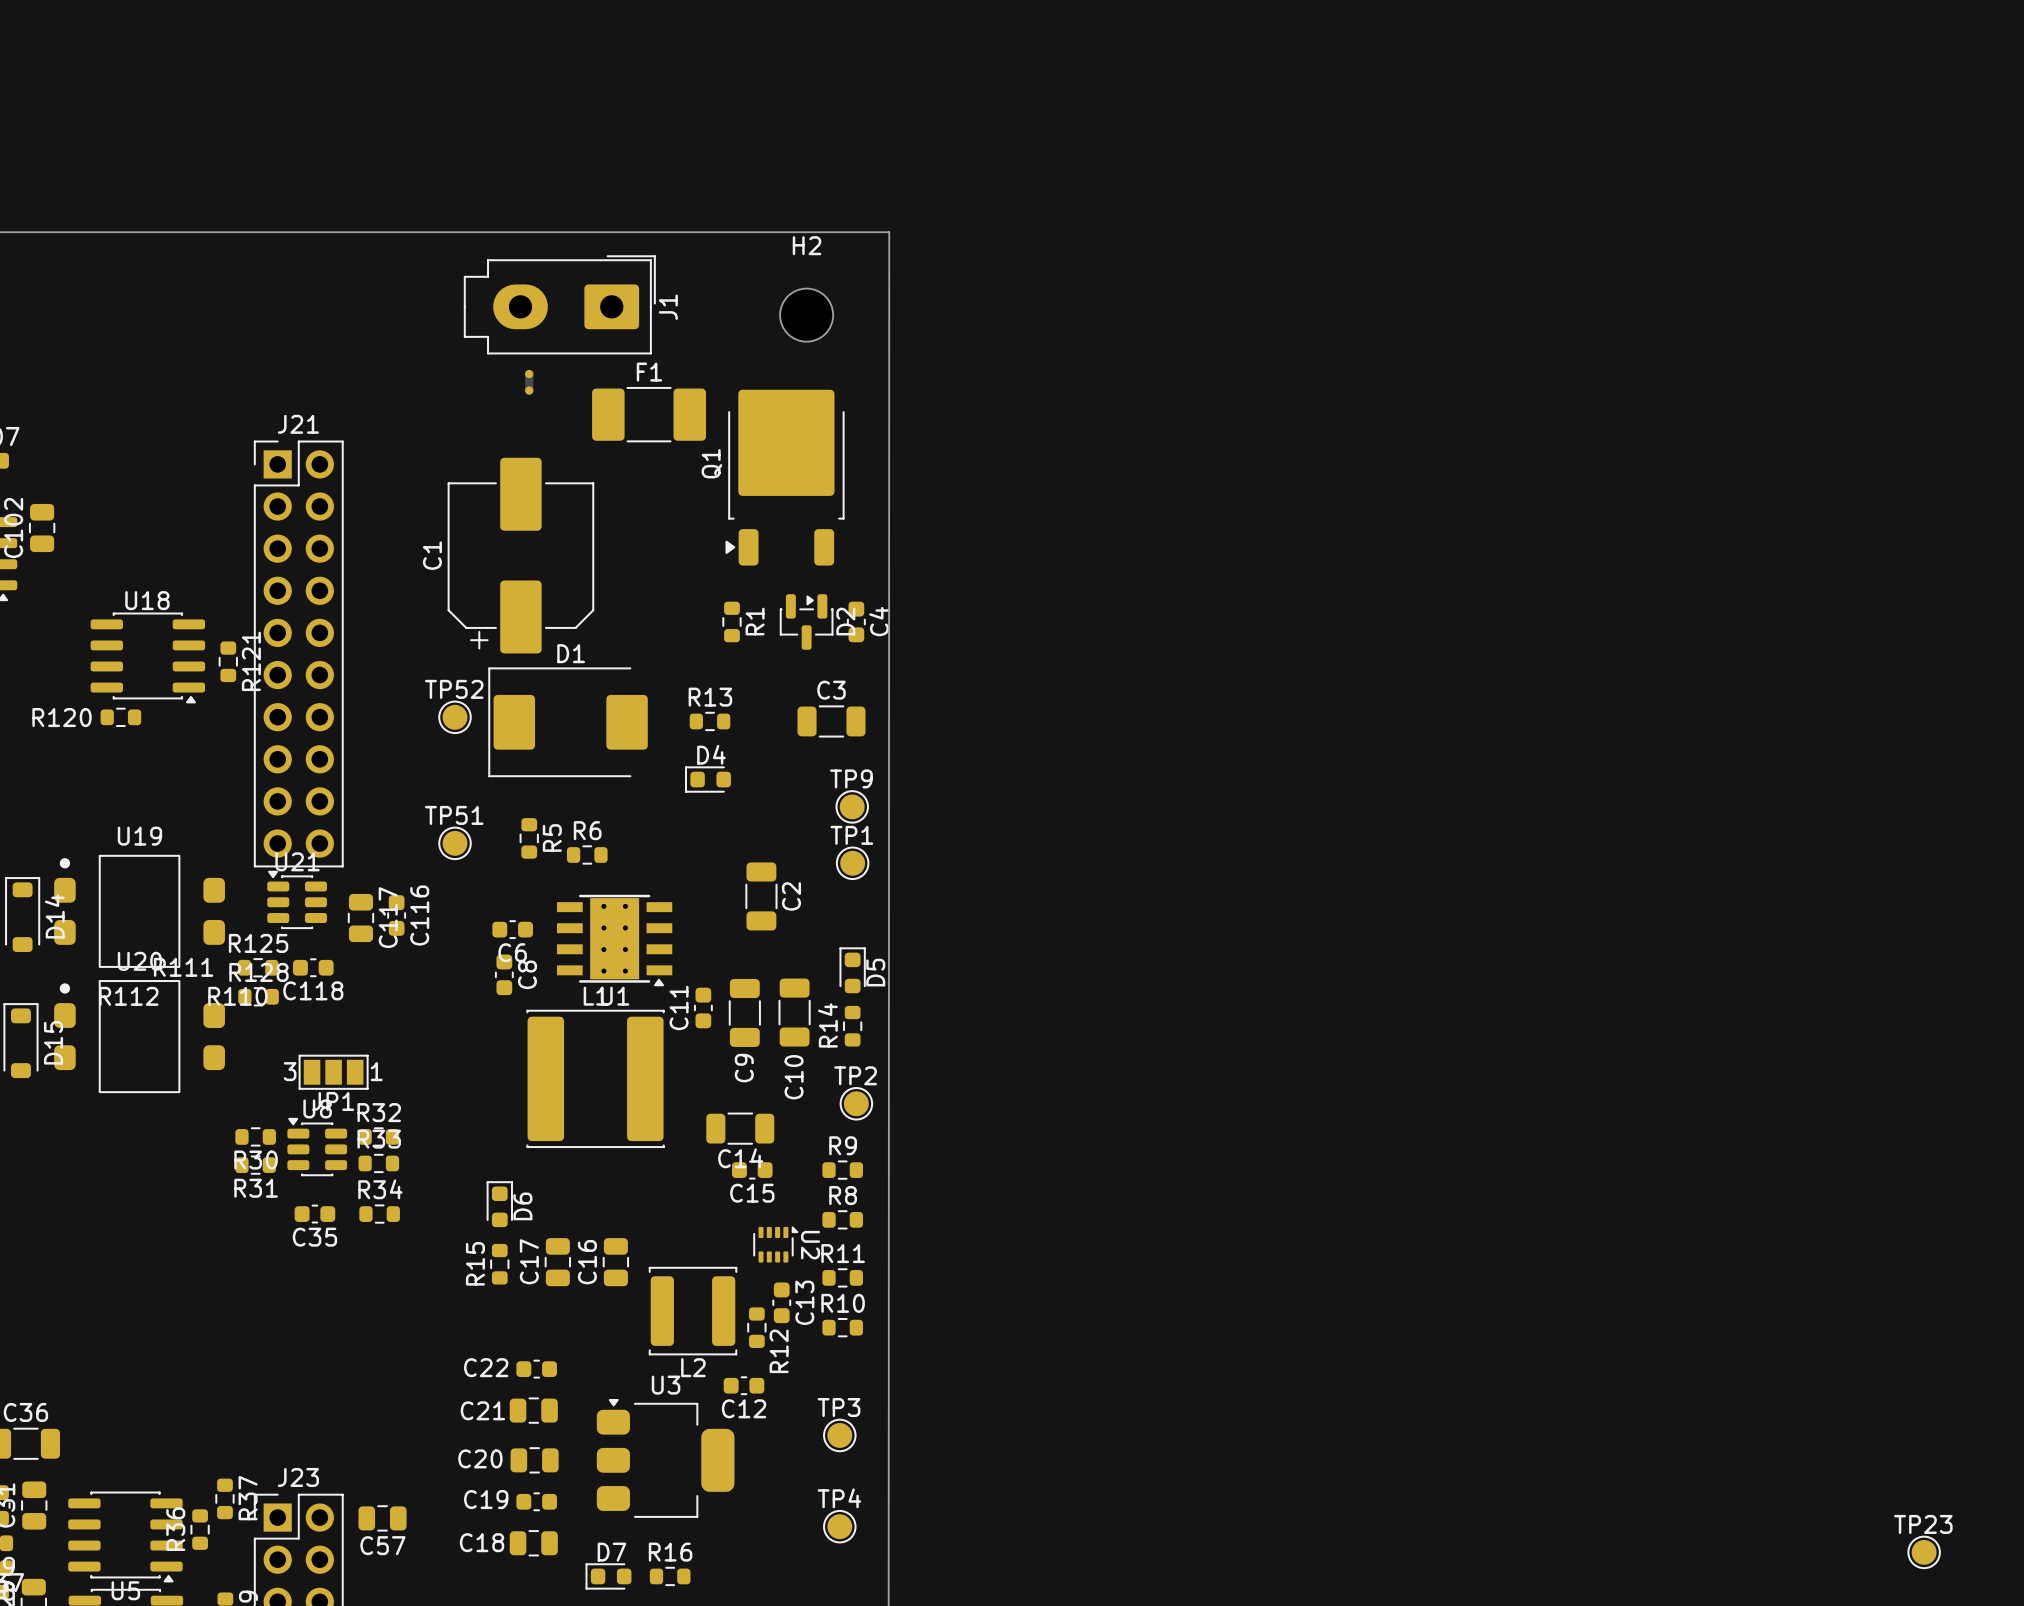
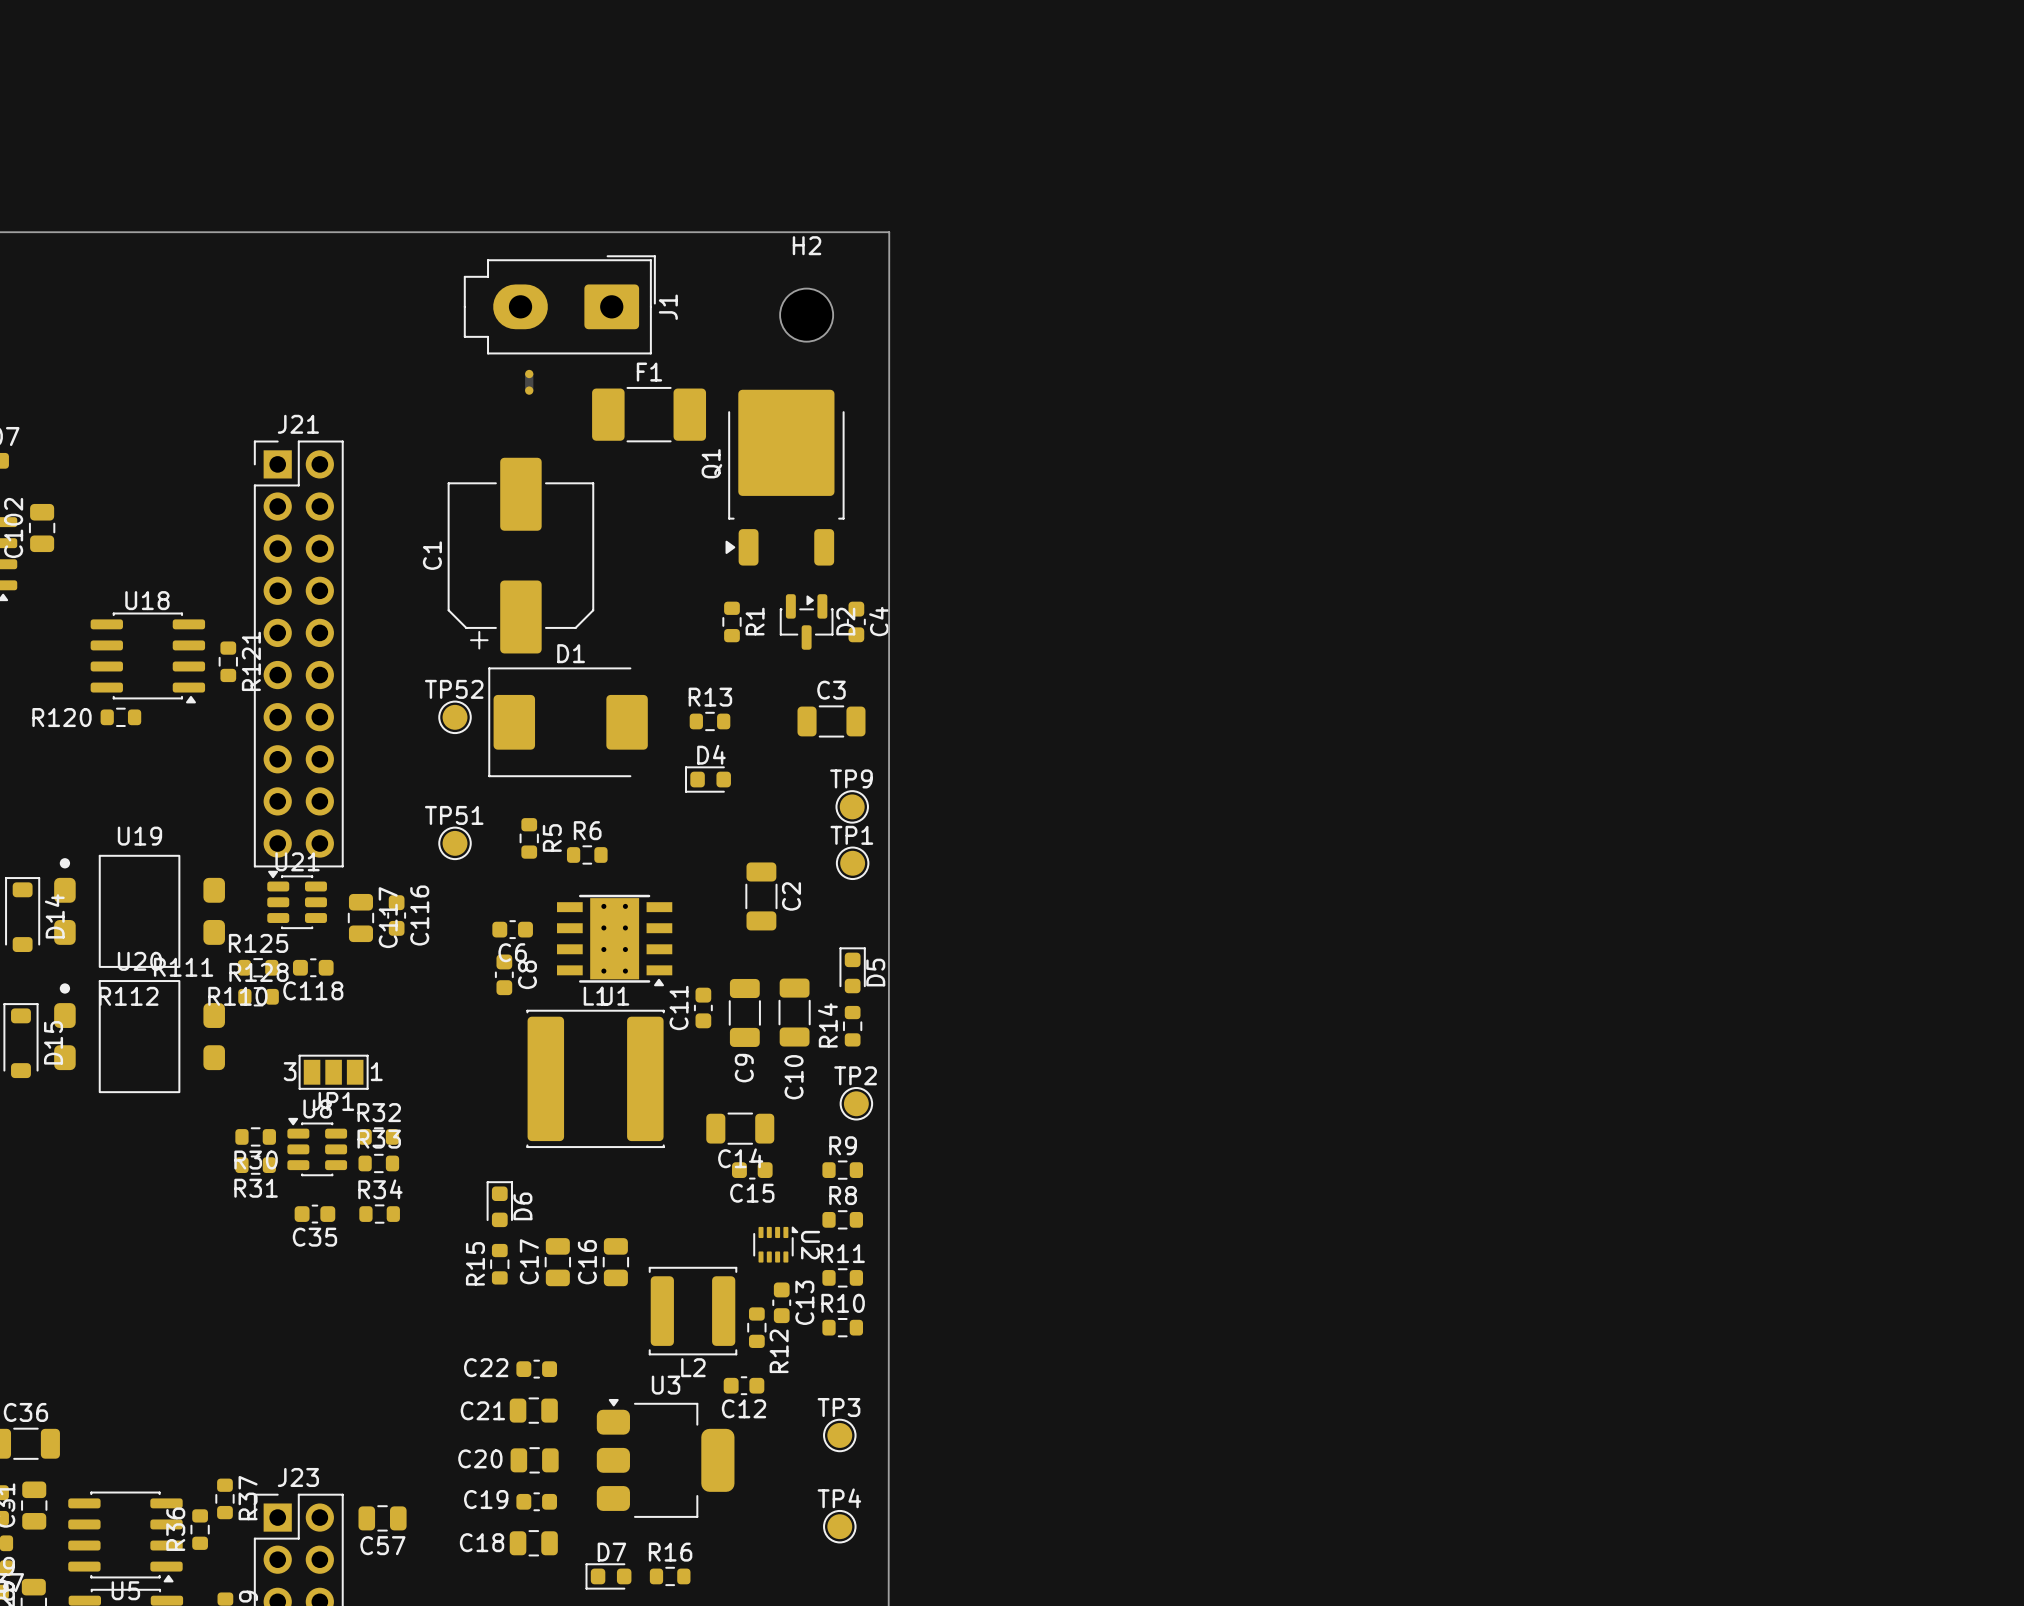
TP23: (1924, 1552) -> none

